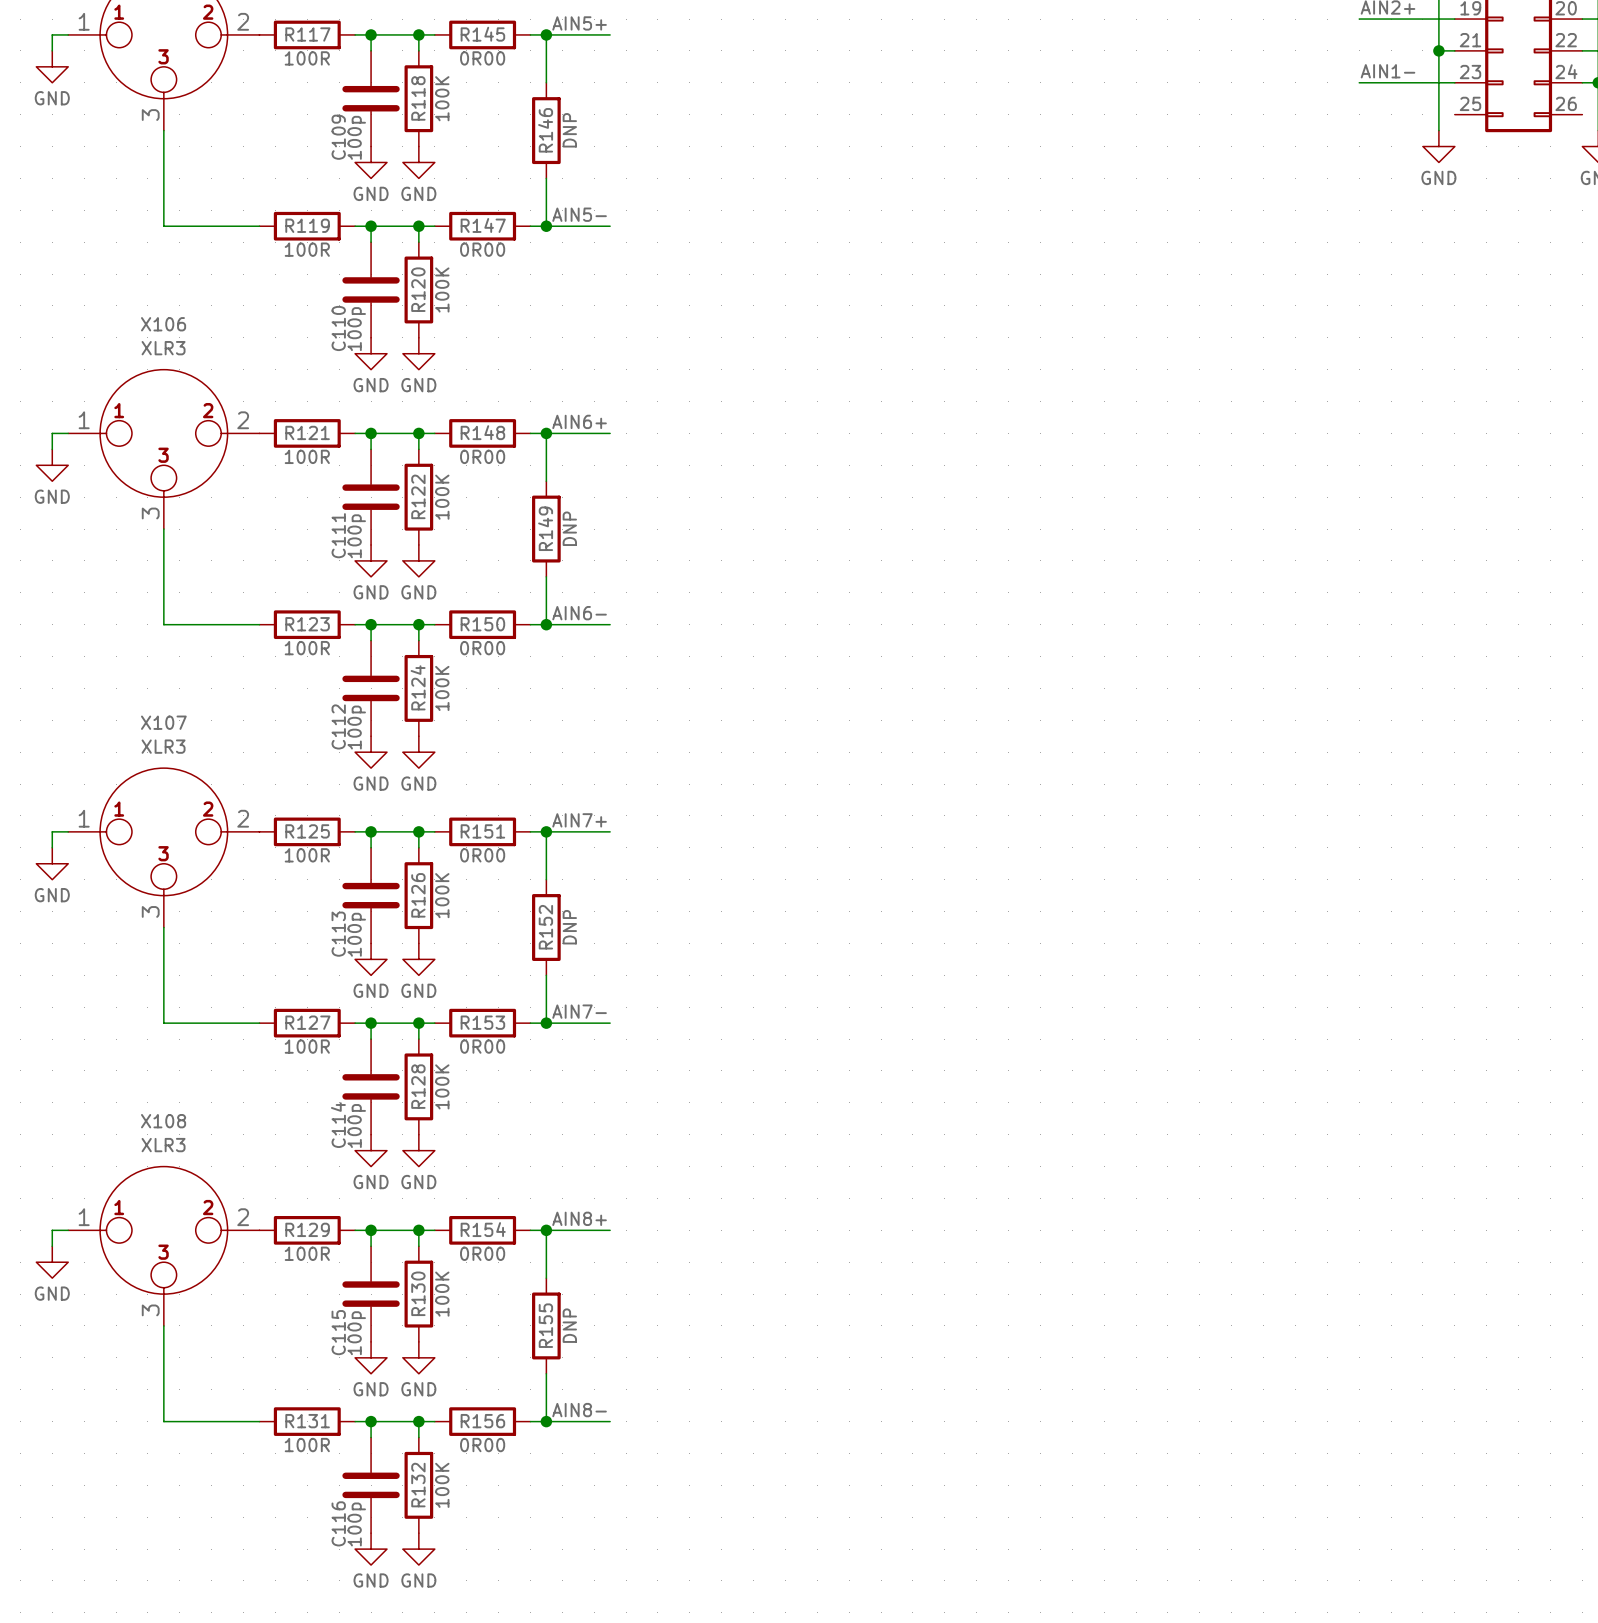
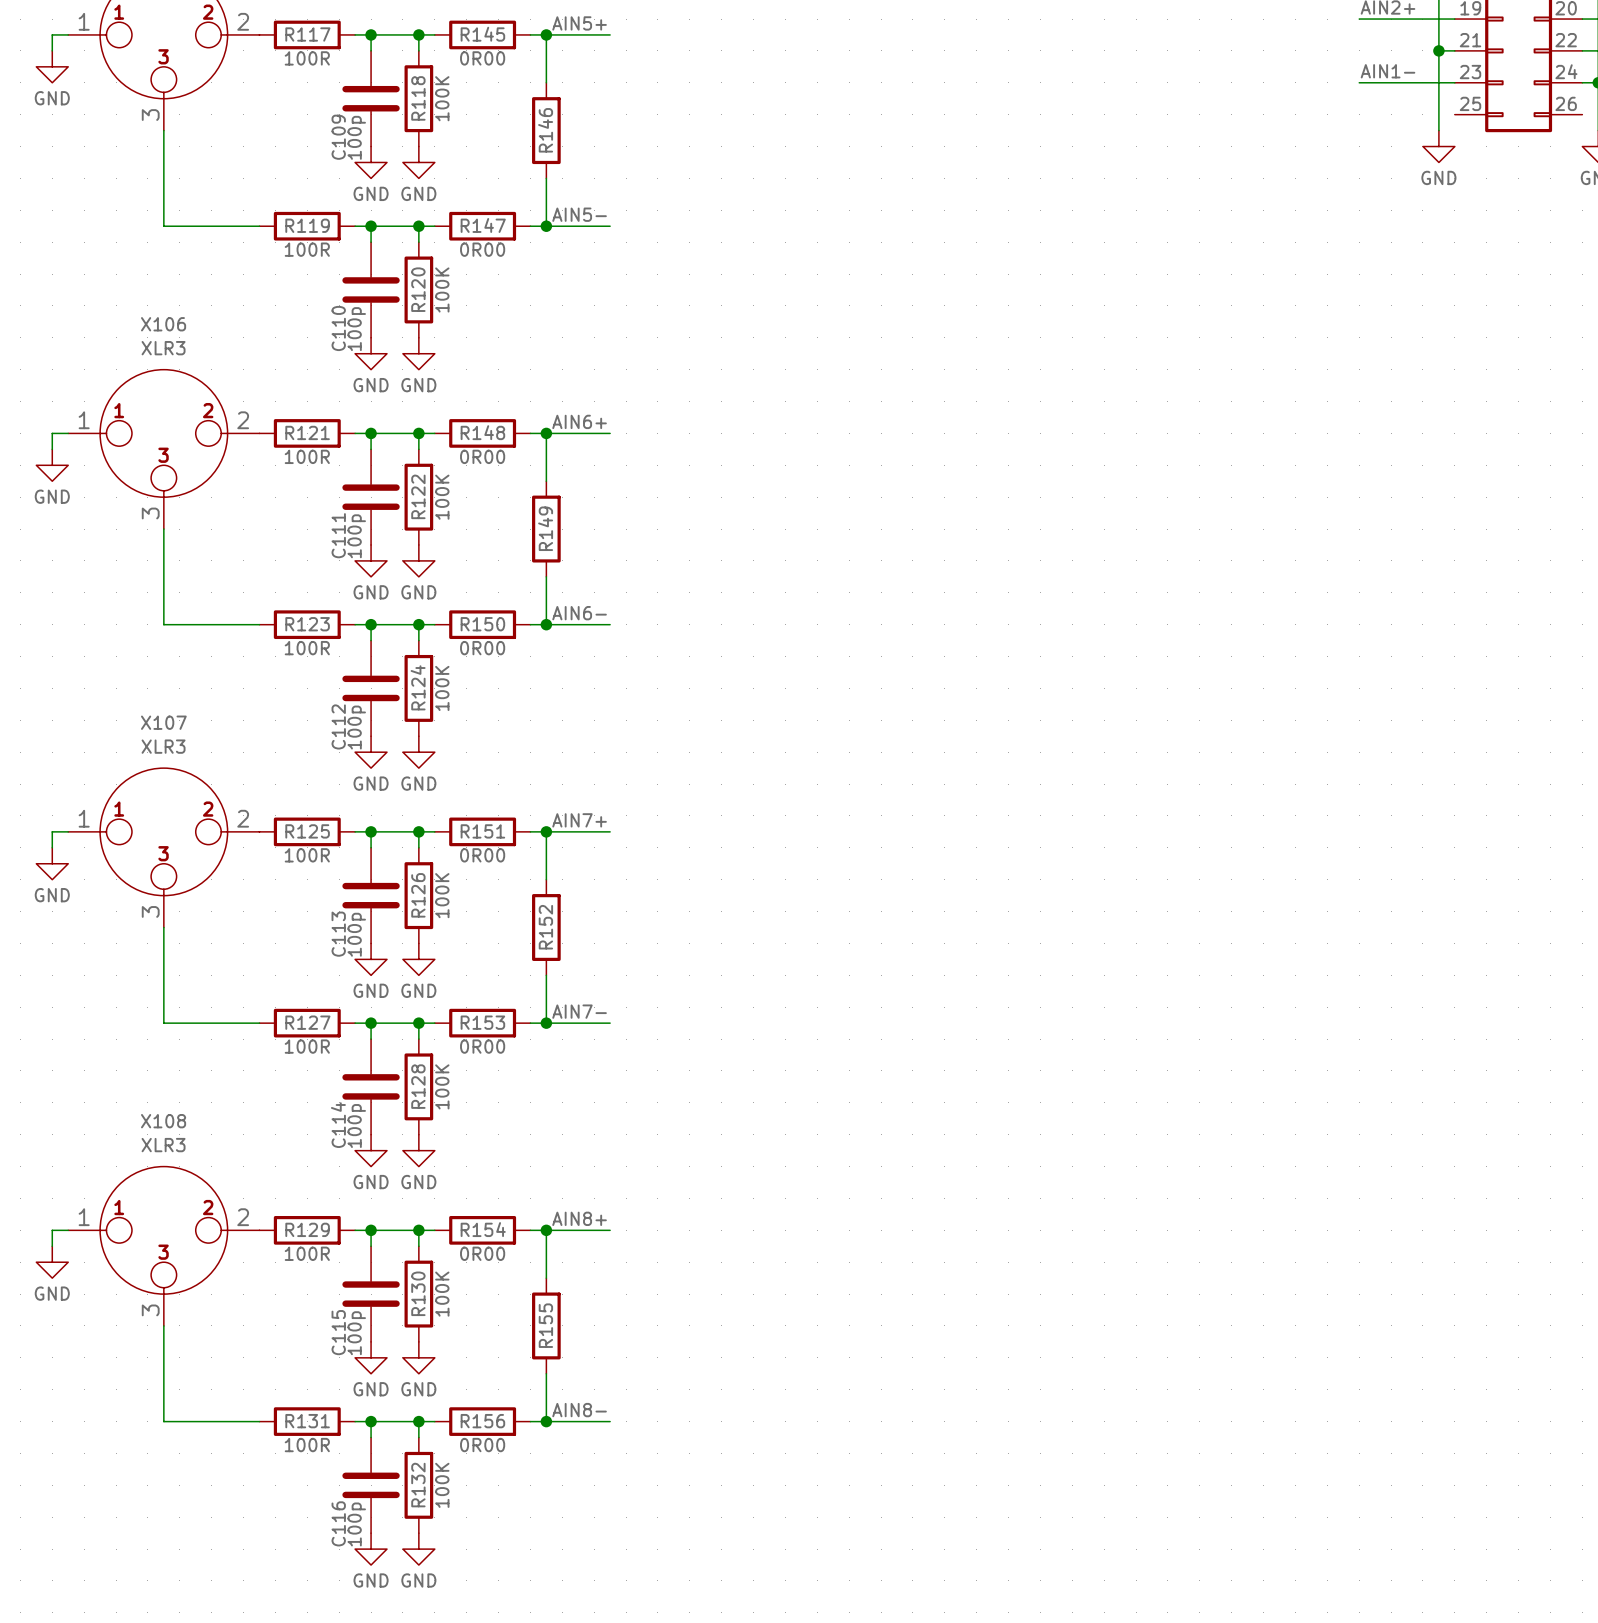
R146 text: DNP (569, 130) -> none
R149 text: DNP (569, 528) -> none
R152 text: DNP (569, 927) -> none
R155 text: DNP (569, 1325) -> none

